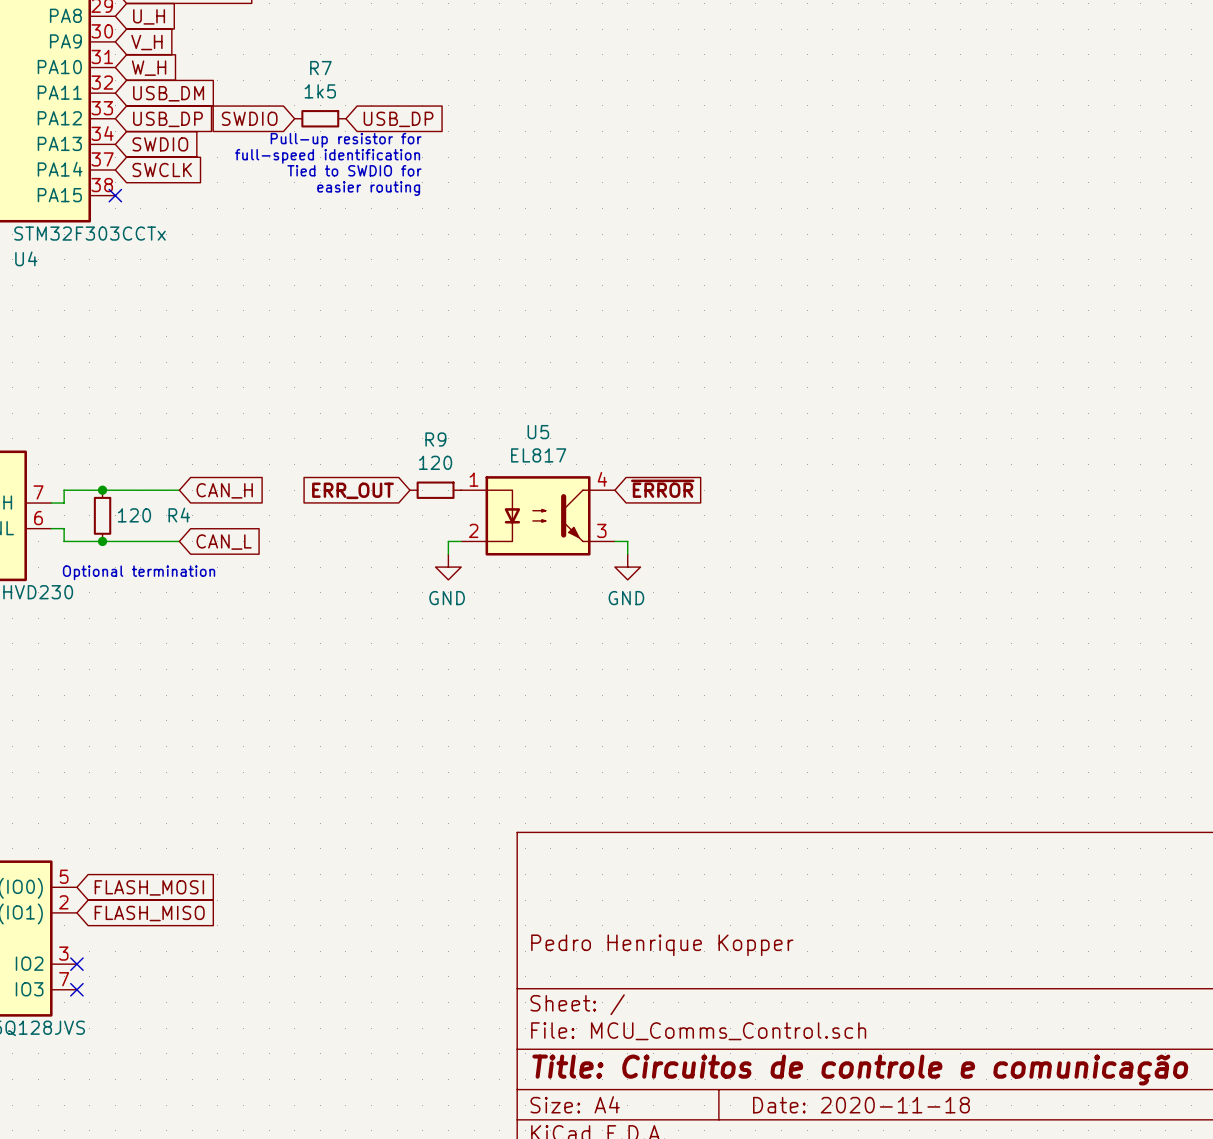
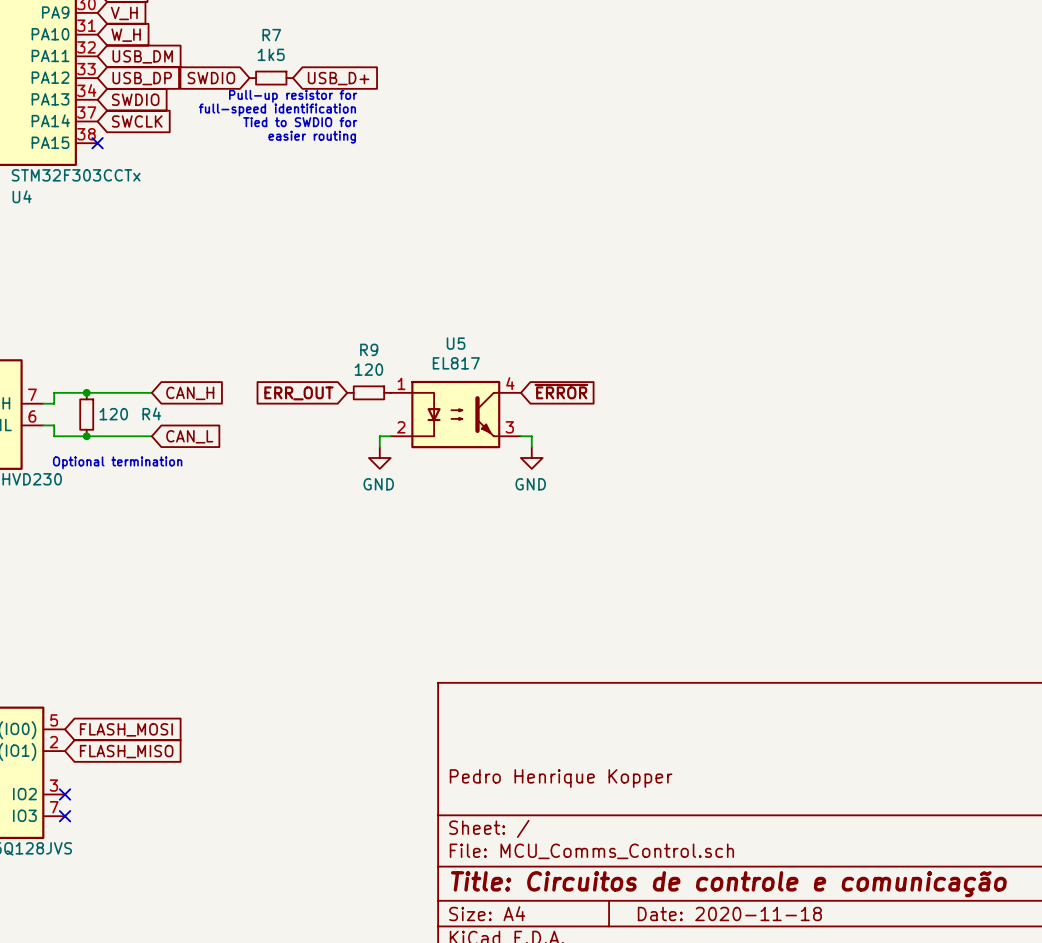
global label: USB_DP (398, 119) -> USB_D+ (338, 78)

